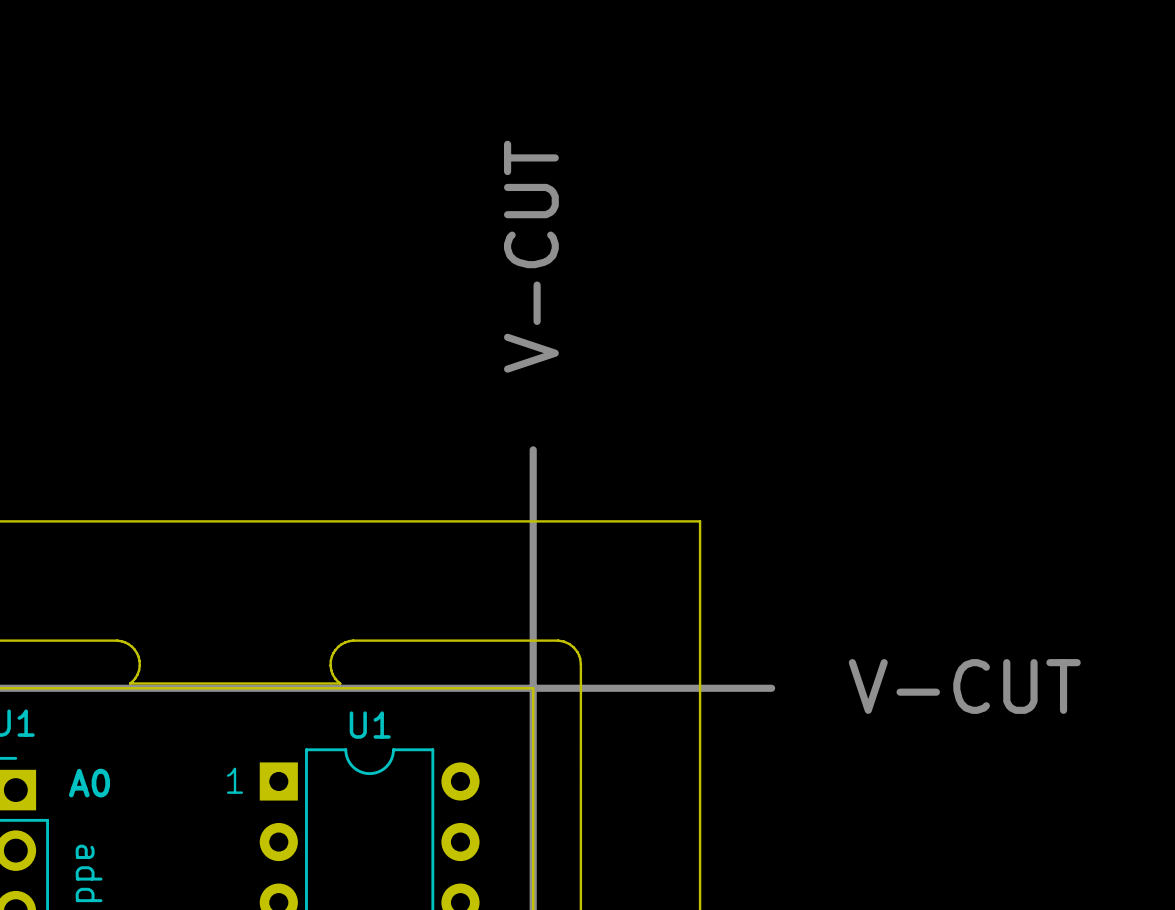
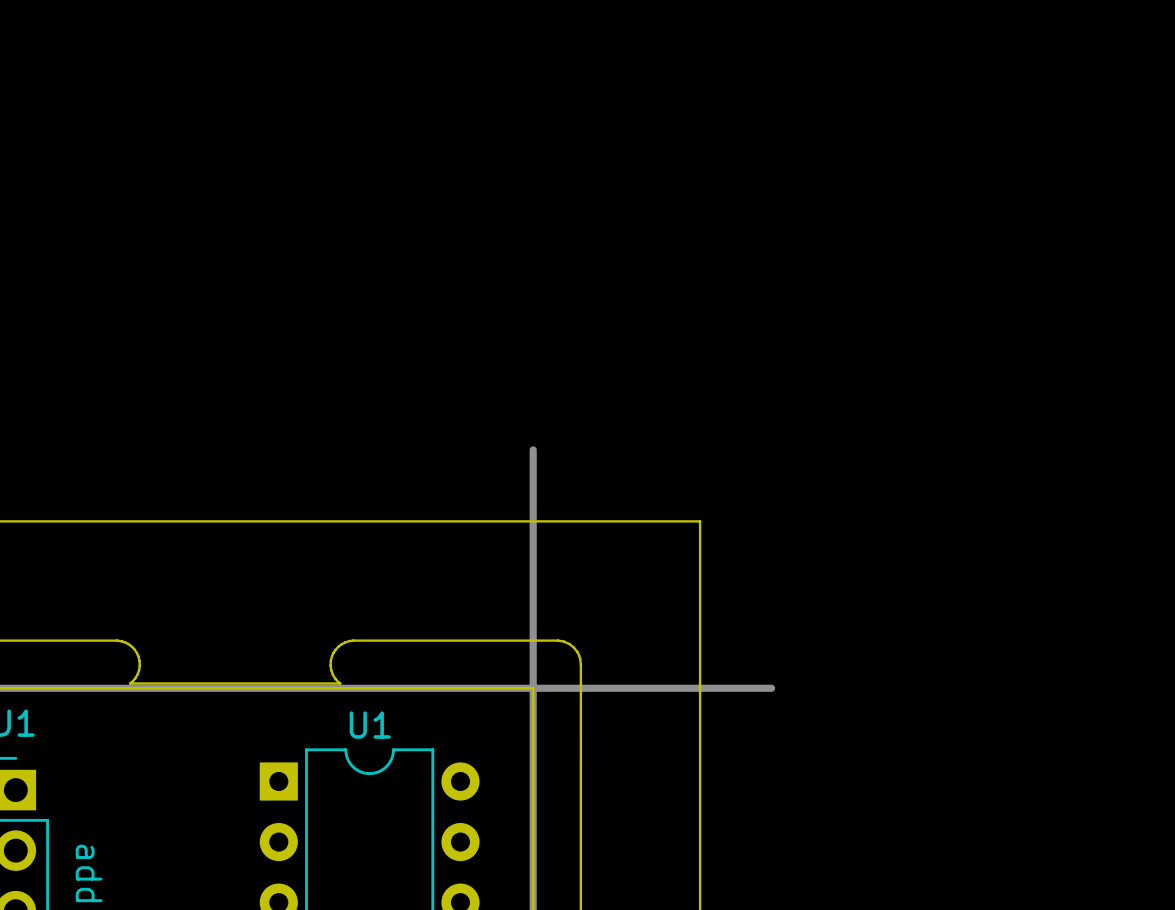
text: V-CUT (531, 256) -> none
text: V-CUT (964, 686) -> none
text: 1 (234, 780) -> none
text: A0 (89, 783) -> none

